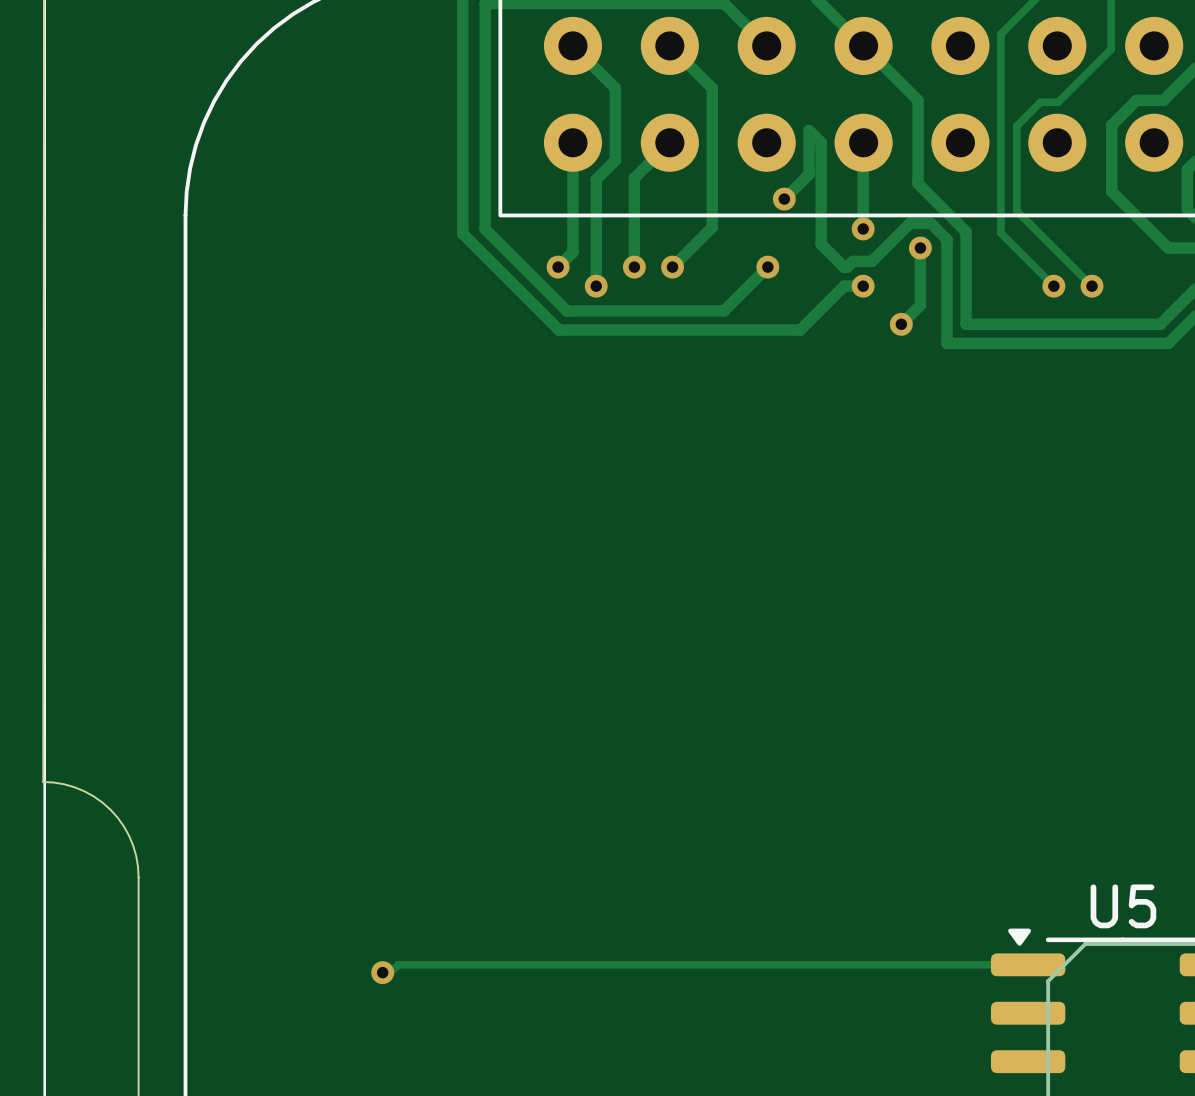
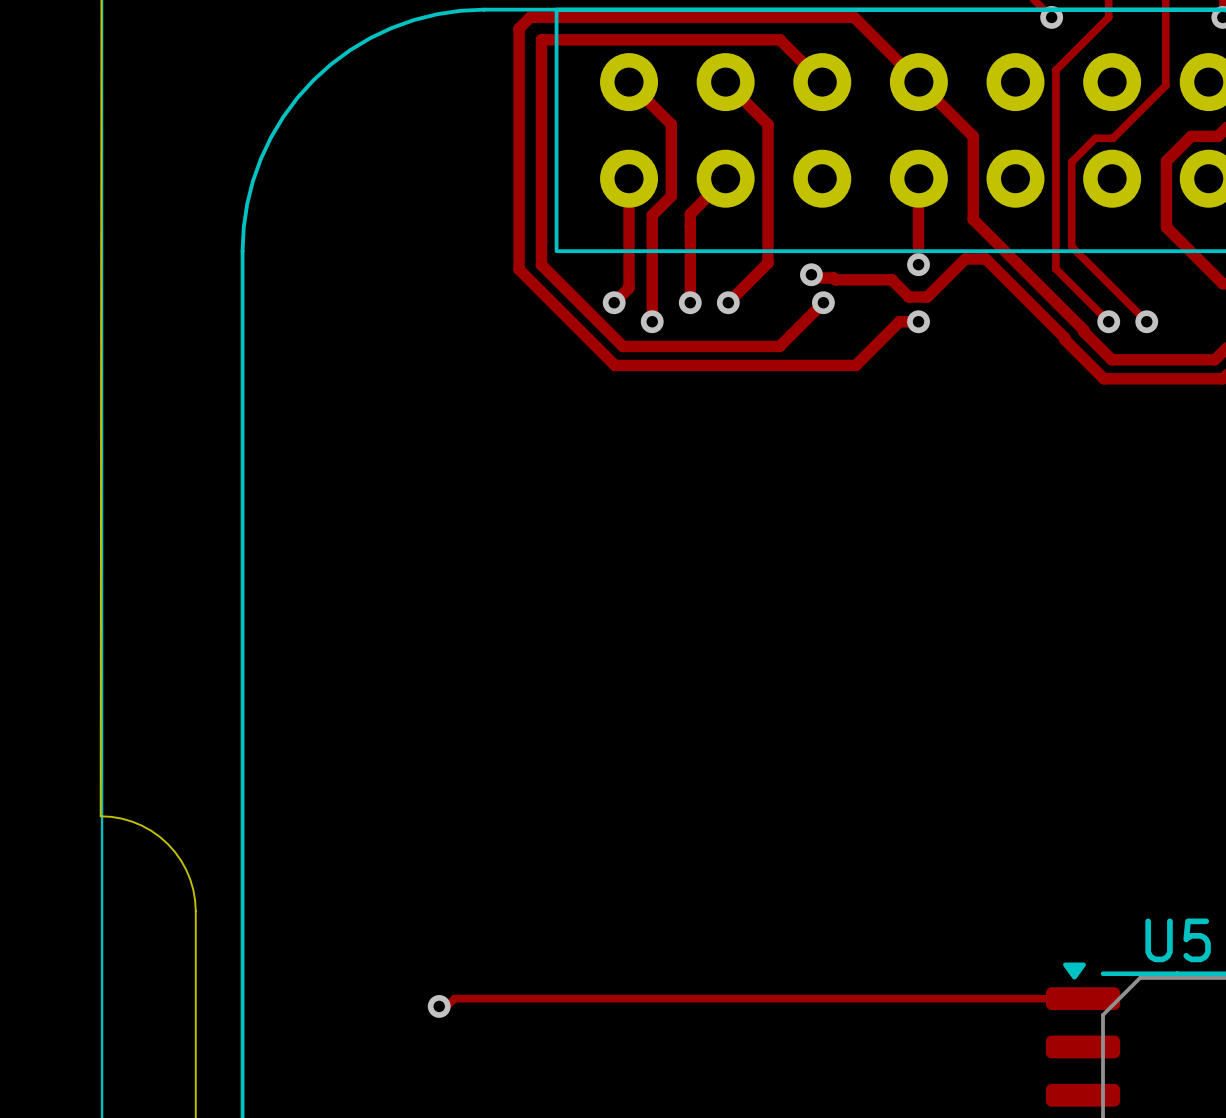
track: (784, 199) (809, 174) (809, 130) (821, 142) (821, 244) (844, 267) (847, 267) (852, 261) -> (811, 274) (814, 277) (833, 277) (835, 279) (891, 279) (909, 297)
via position: (784, 199) -> (811, 274)
track: (966, 231) (966, 324) (1056, 324) -> (1021, 267) (1111, 359)
track: (947, 239) (947, 343) (1049, 343) -> (1002, 275) (1103, 378)
track: (920, 248) (920, 305) (901, 324) -> none
via: (920, 248) -> none
via: (901, 324) -> none

